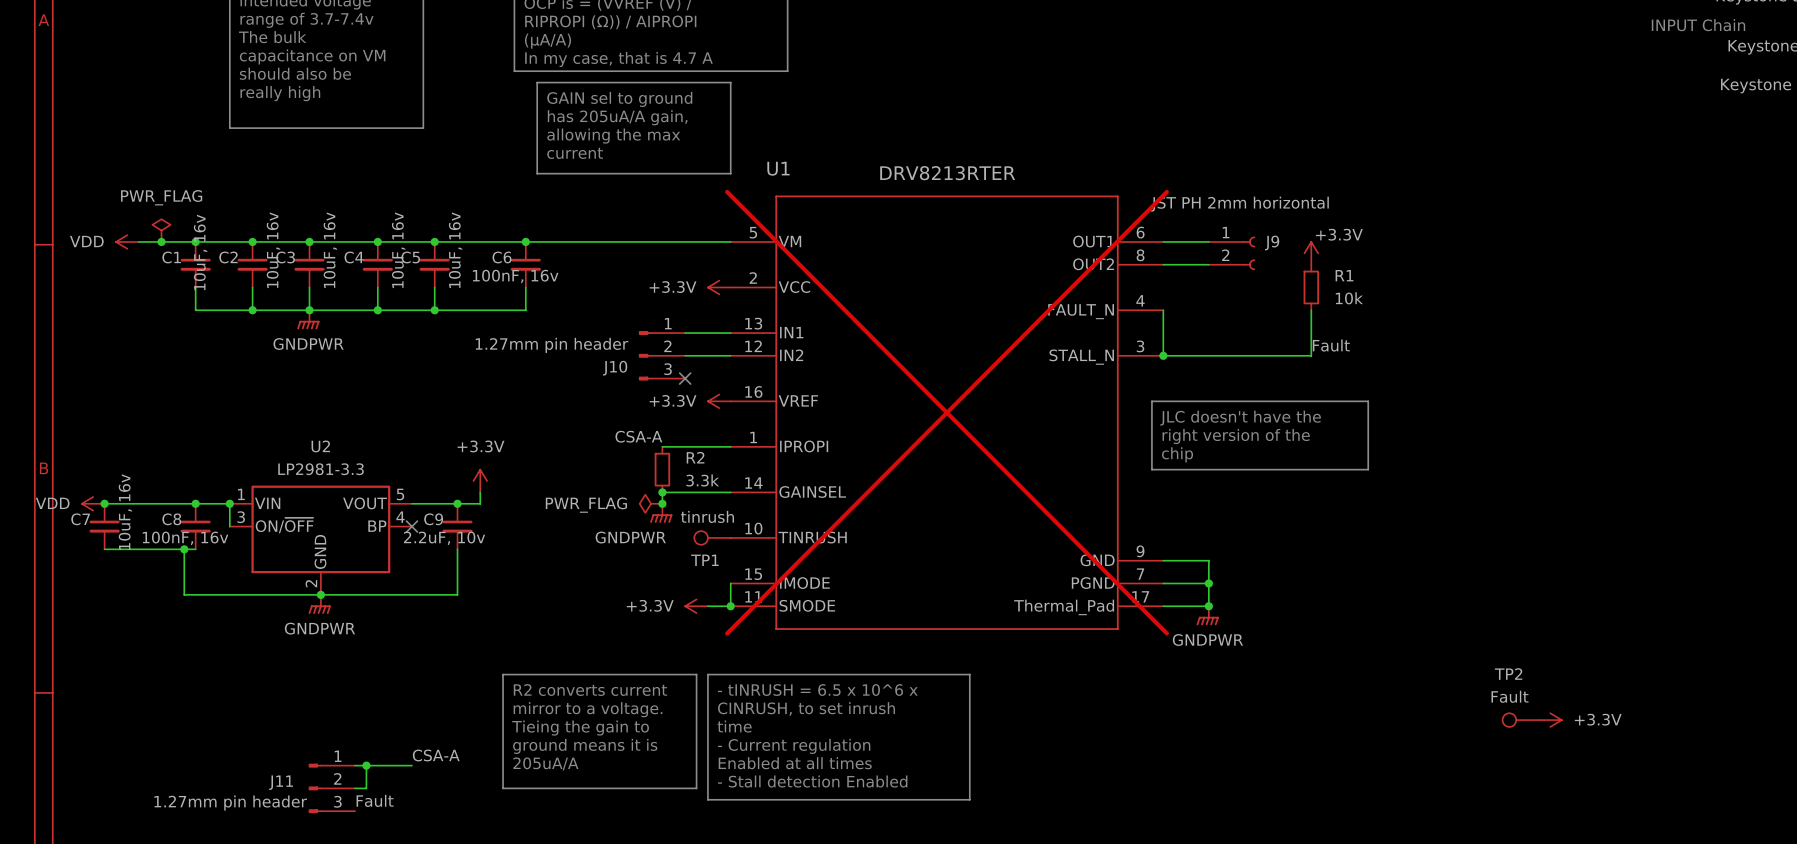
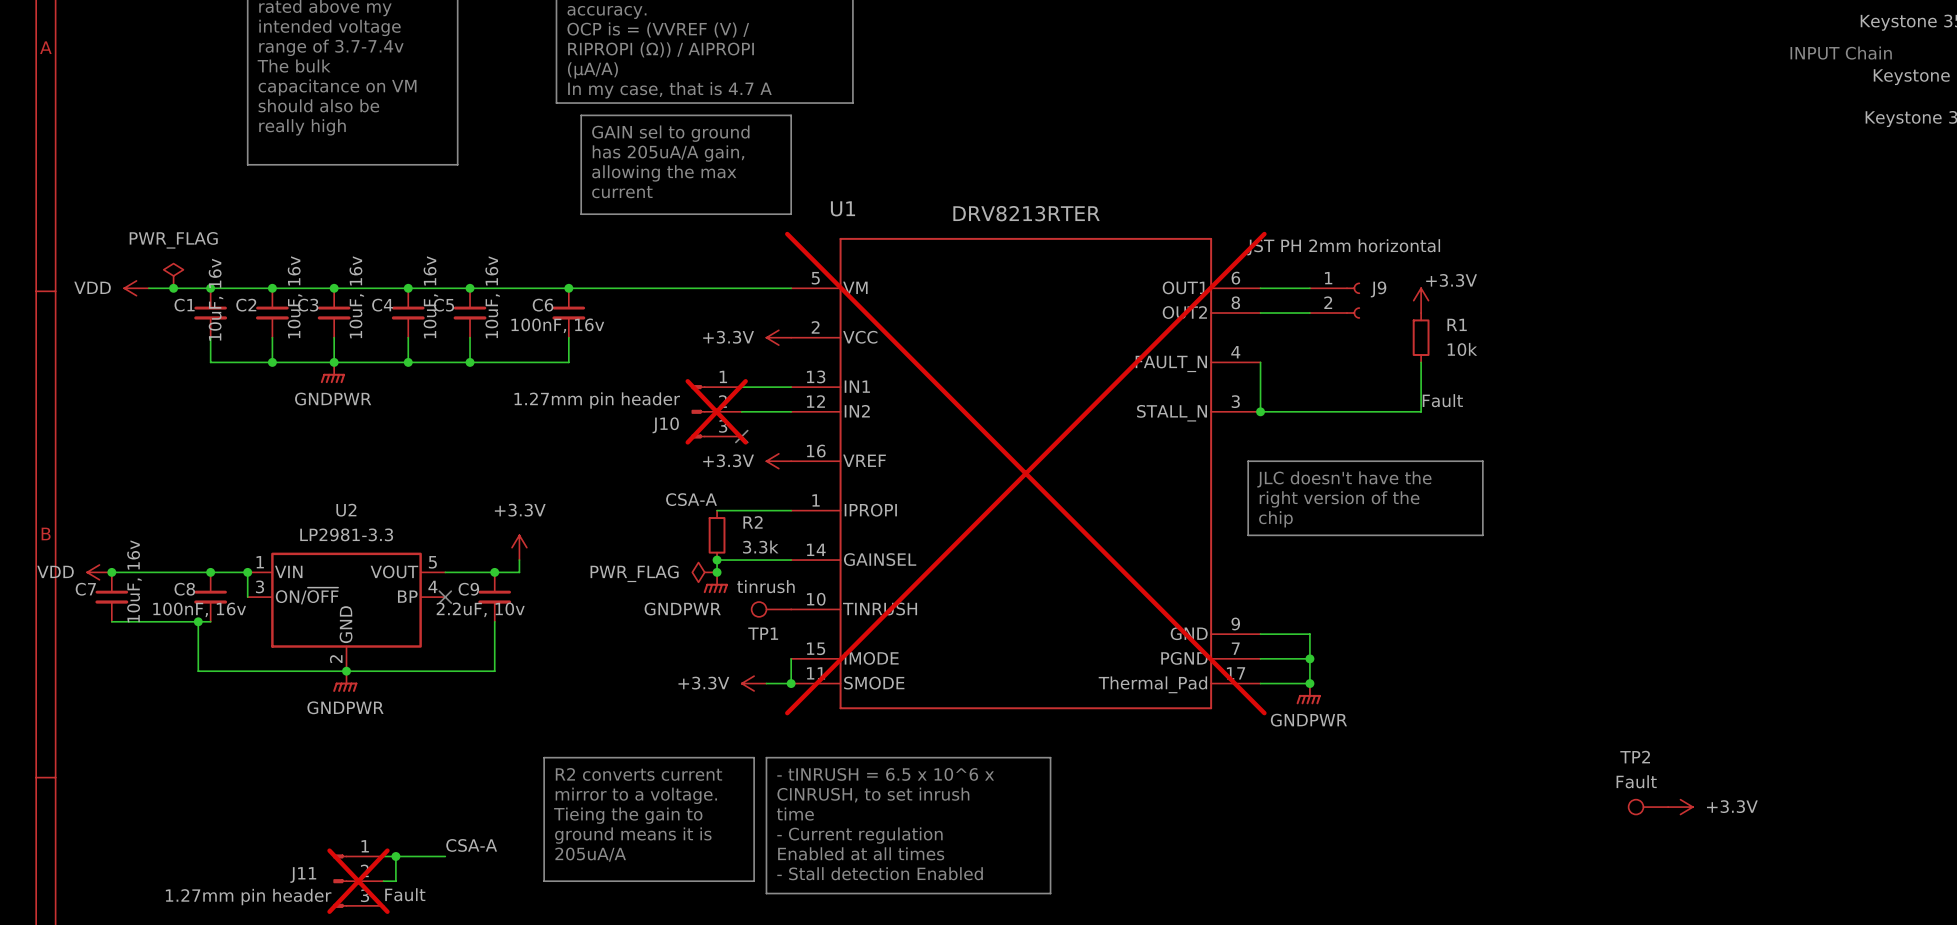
J10 do-not-place cross: none -> (716, 411)
J11 do-not-place cross: none -> (358, 881)

